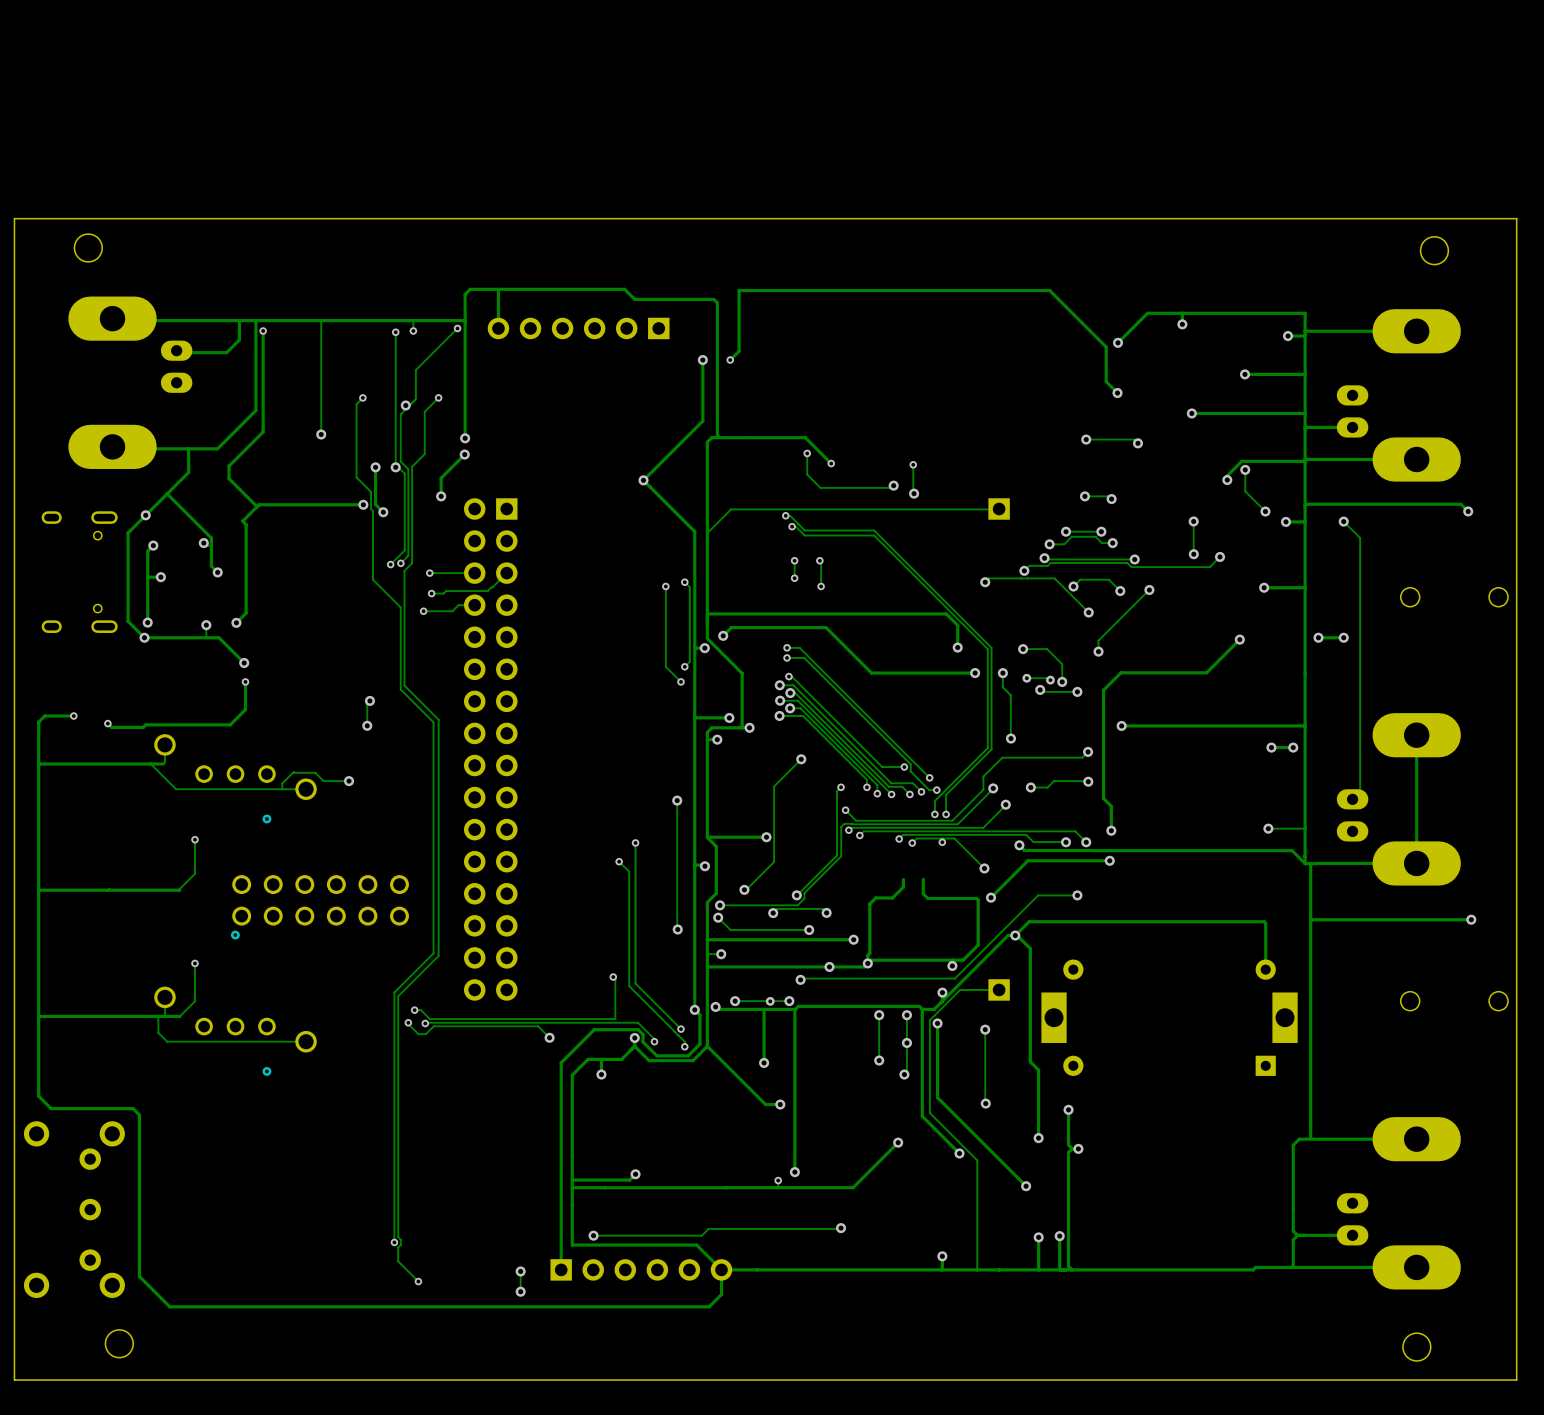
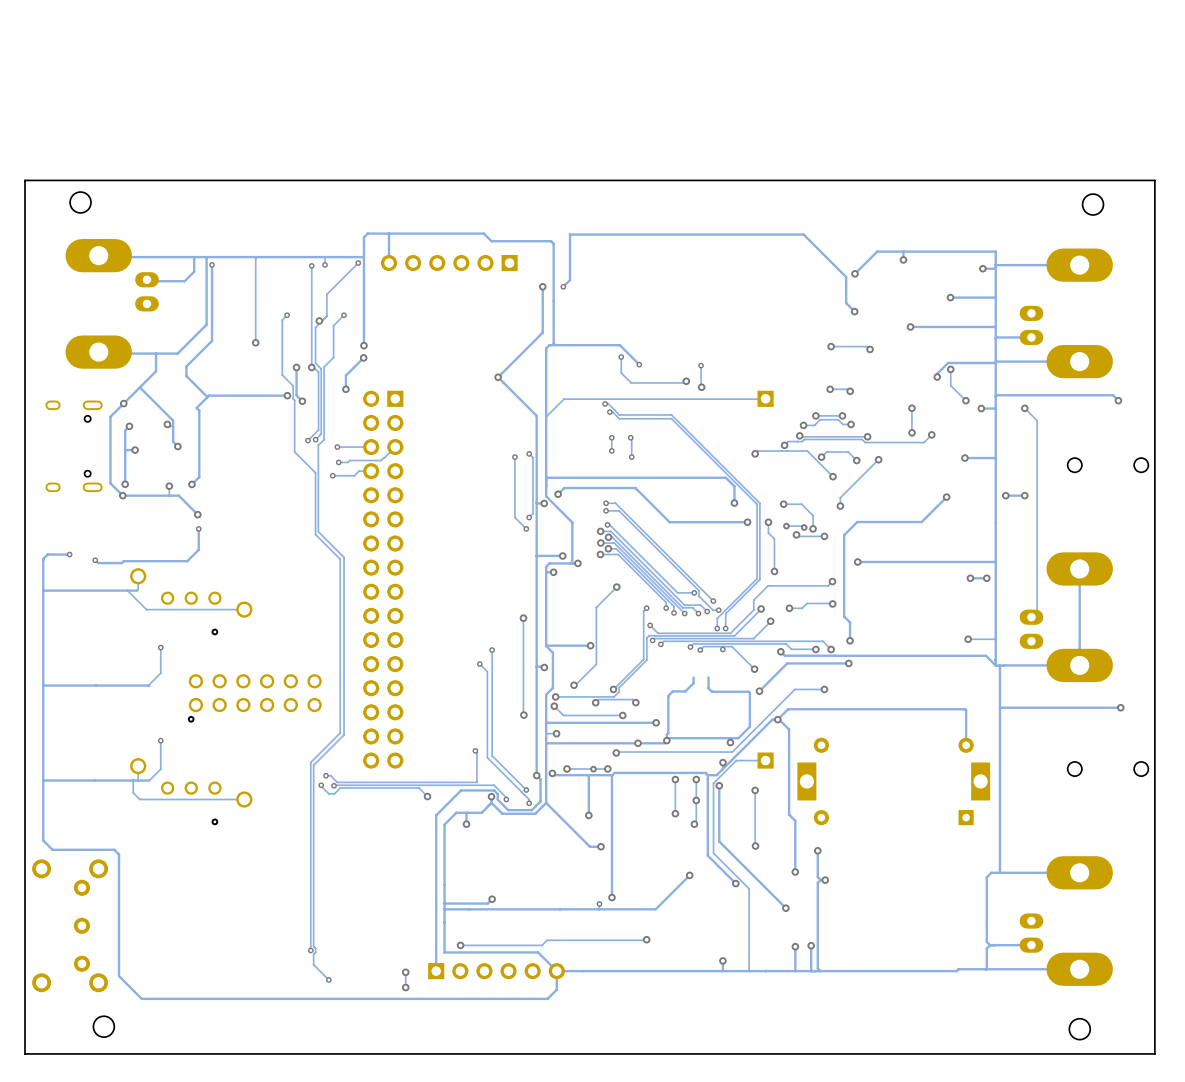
track: (369, 700) (367, 703) (367, 725) -> none
via: (369, 700) -> none
via: (367, 725) -> none
track: (349, 781) (323, 781) (315, 772) (293, 772) (282, 783) (282, 789) -> none
via: (349, 781) -> none

